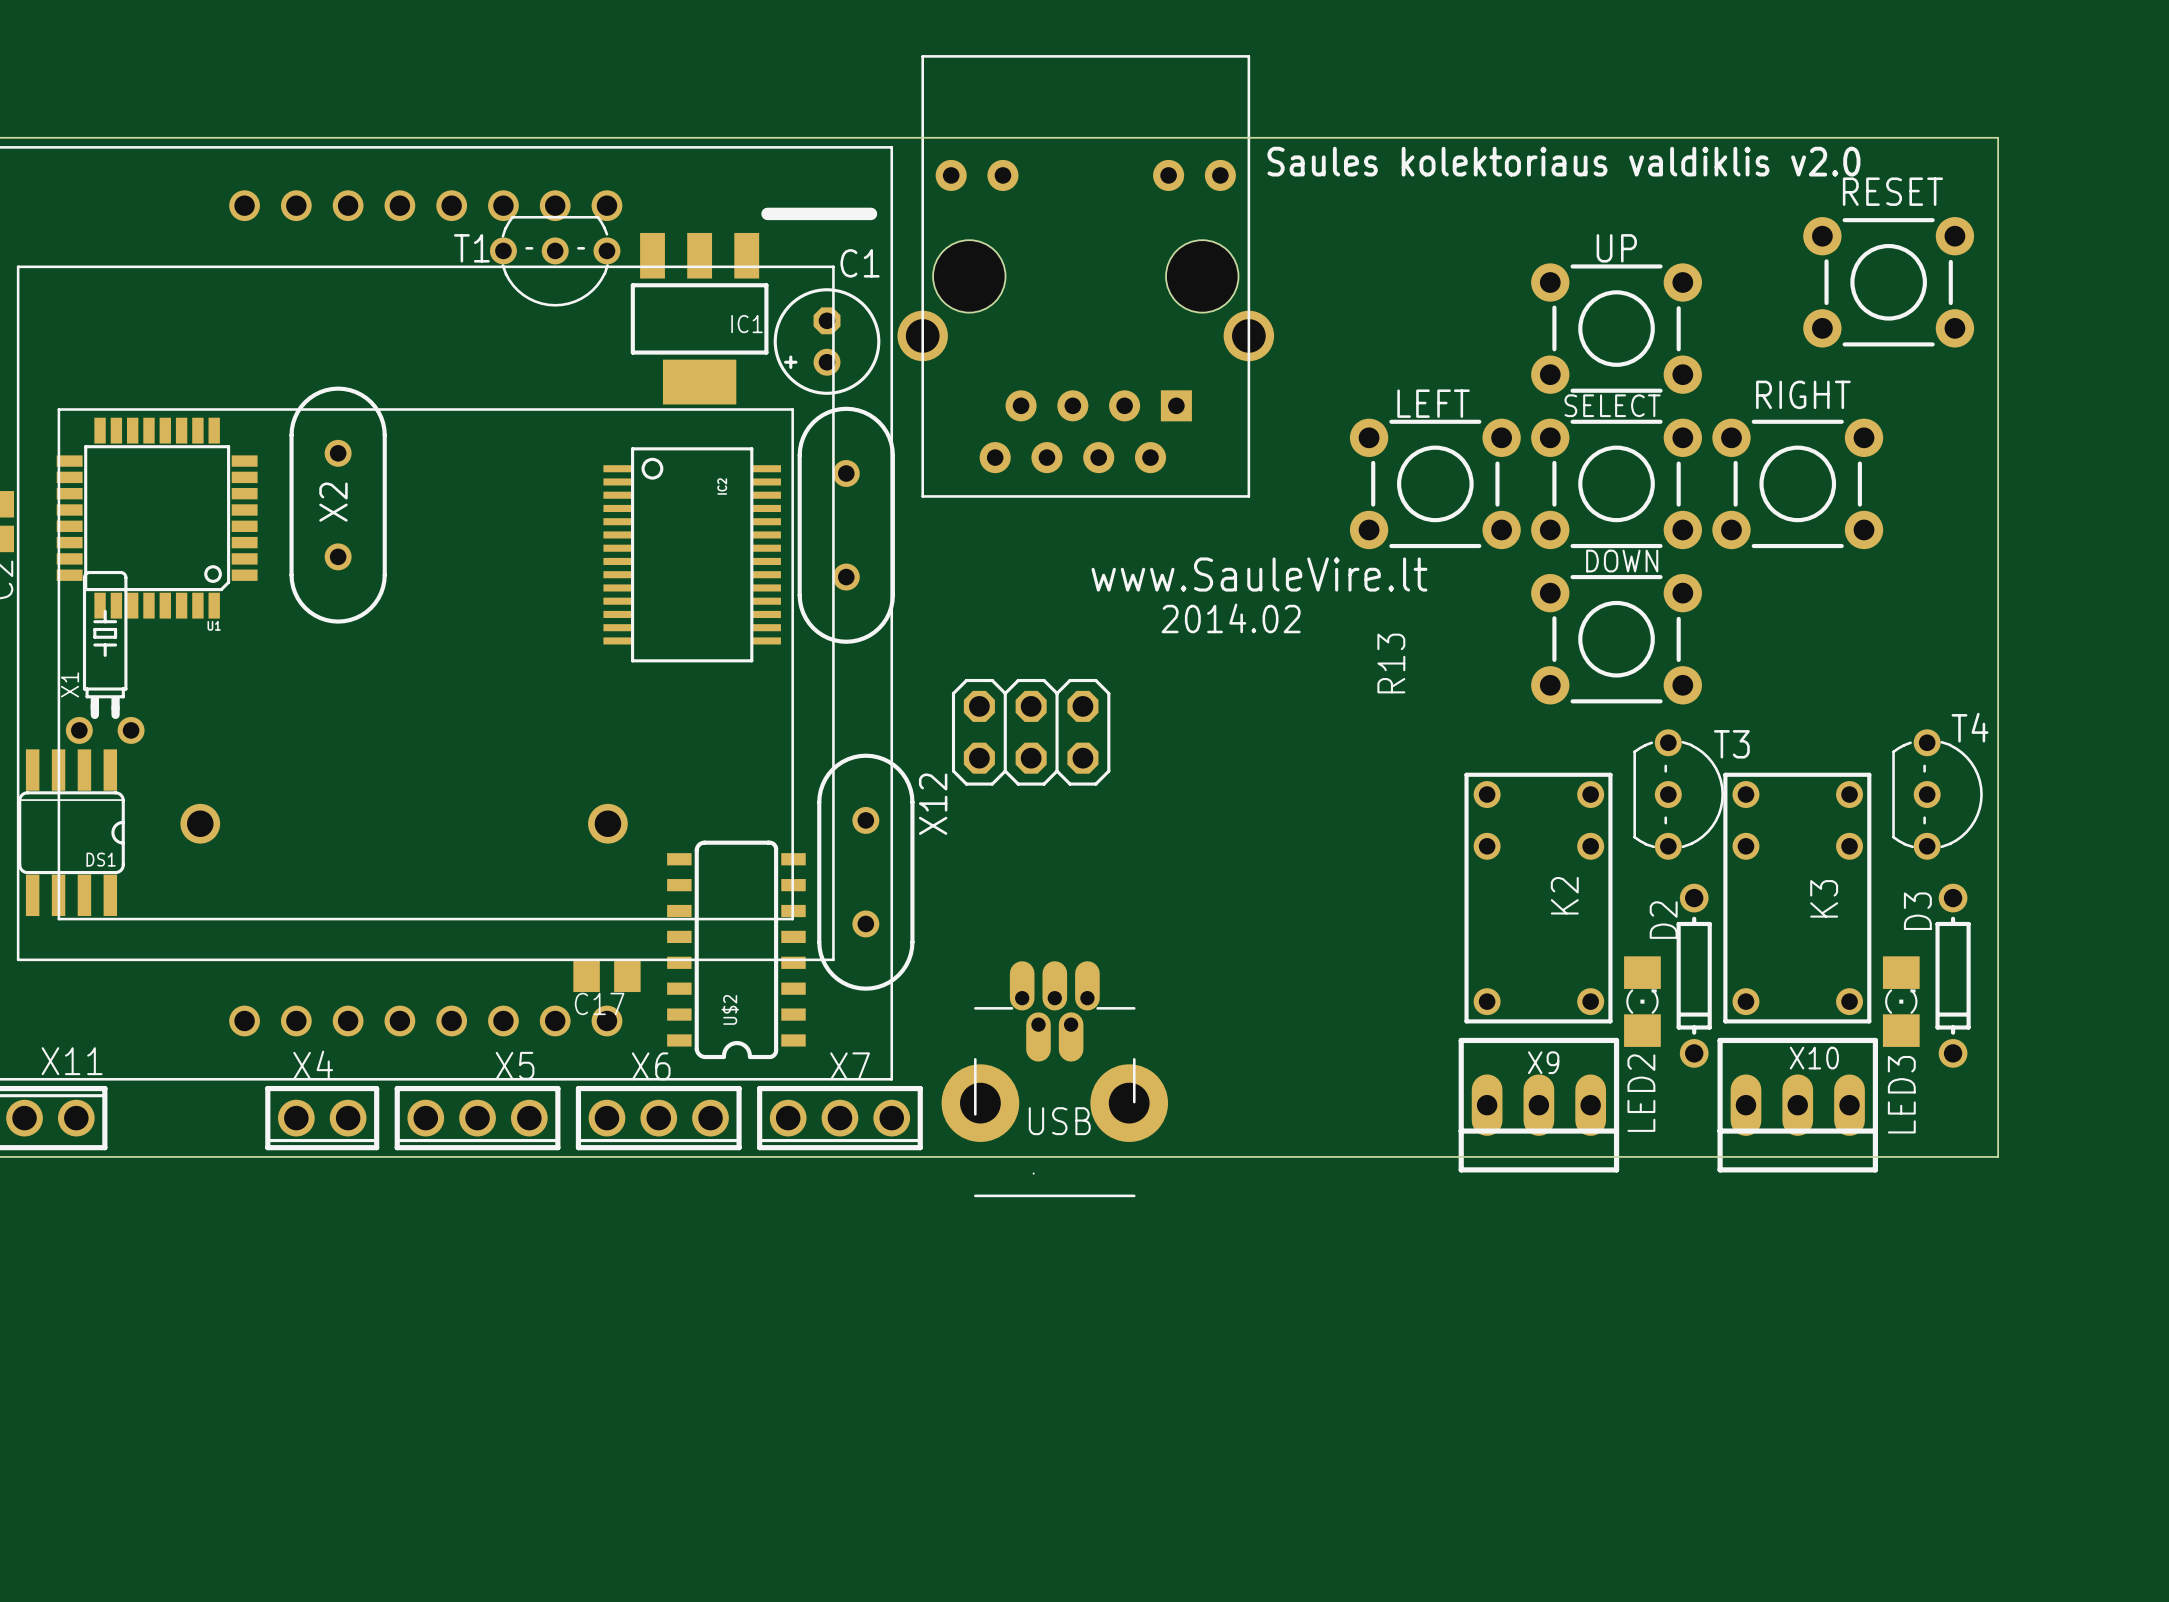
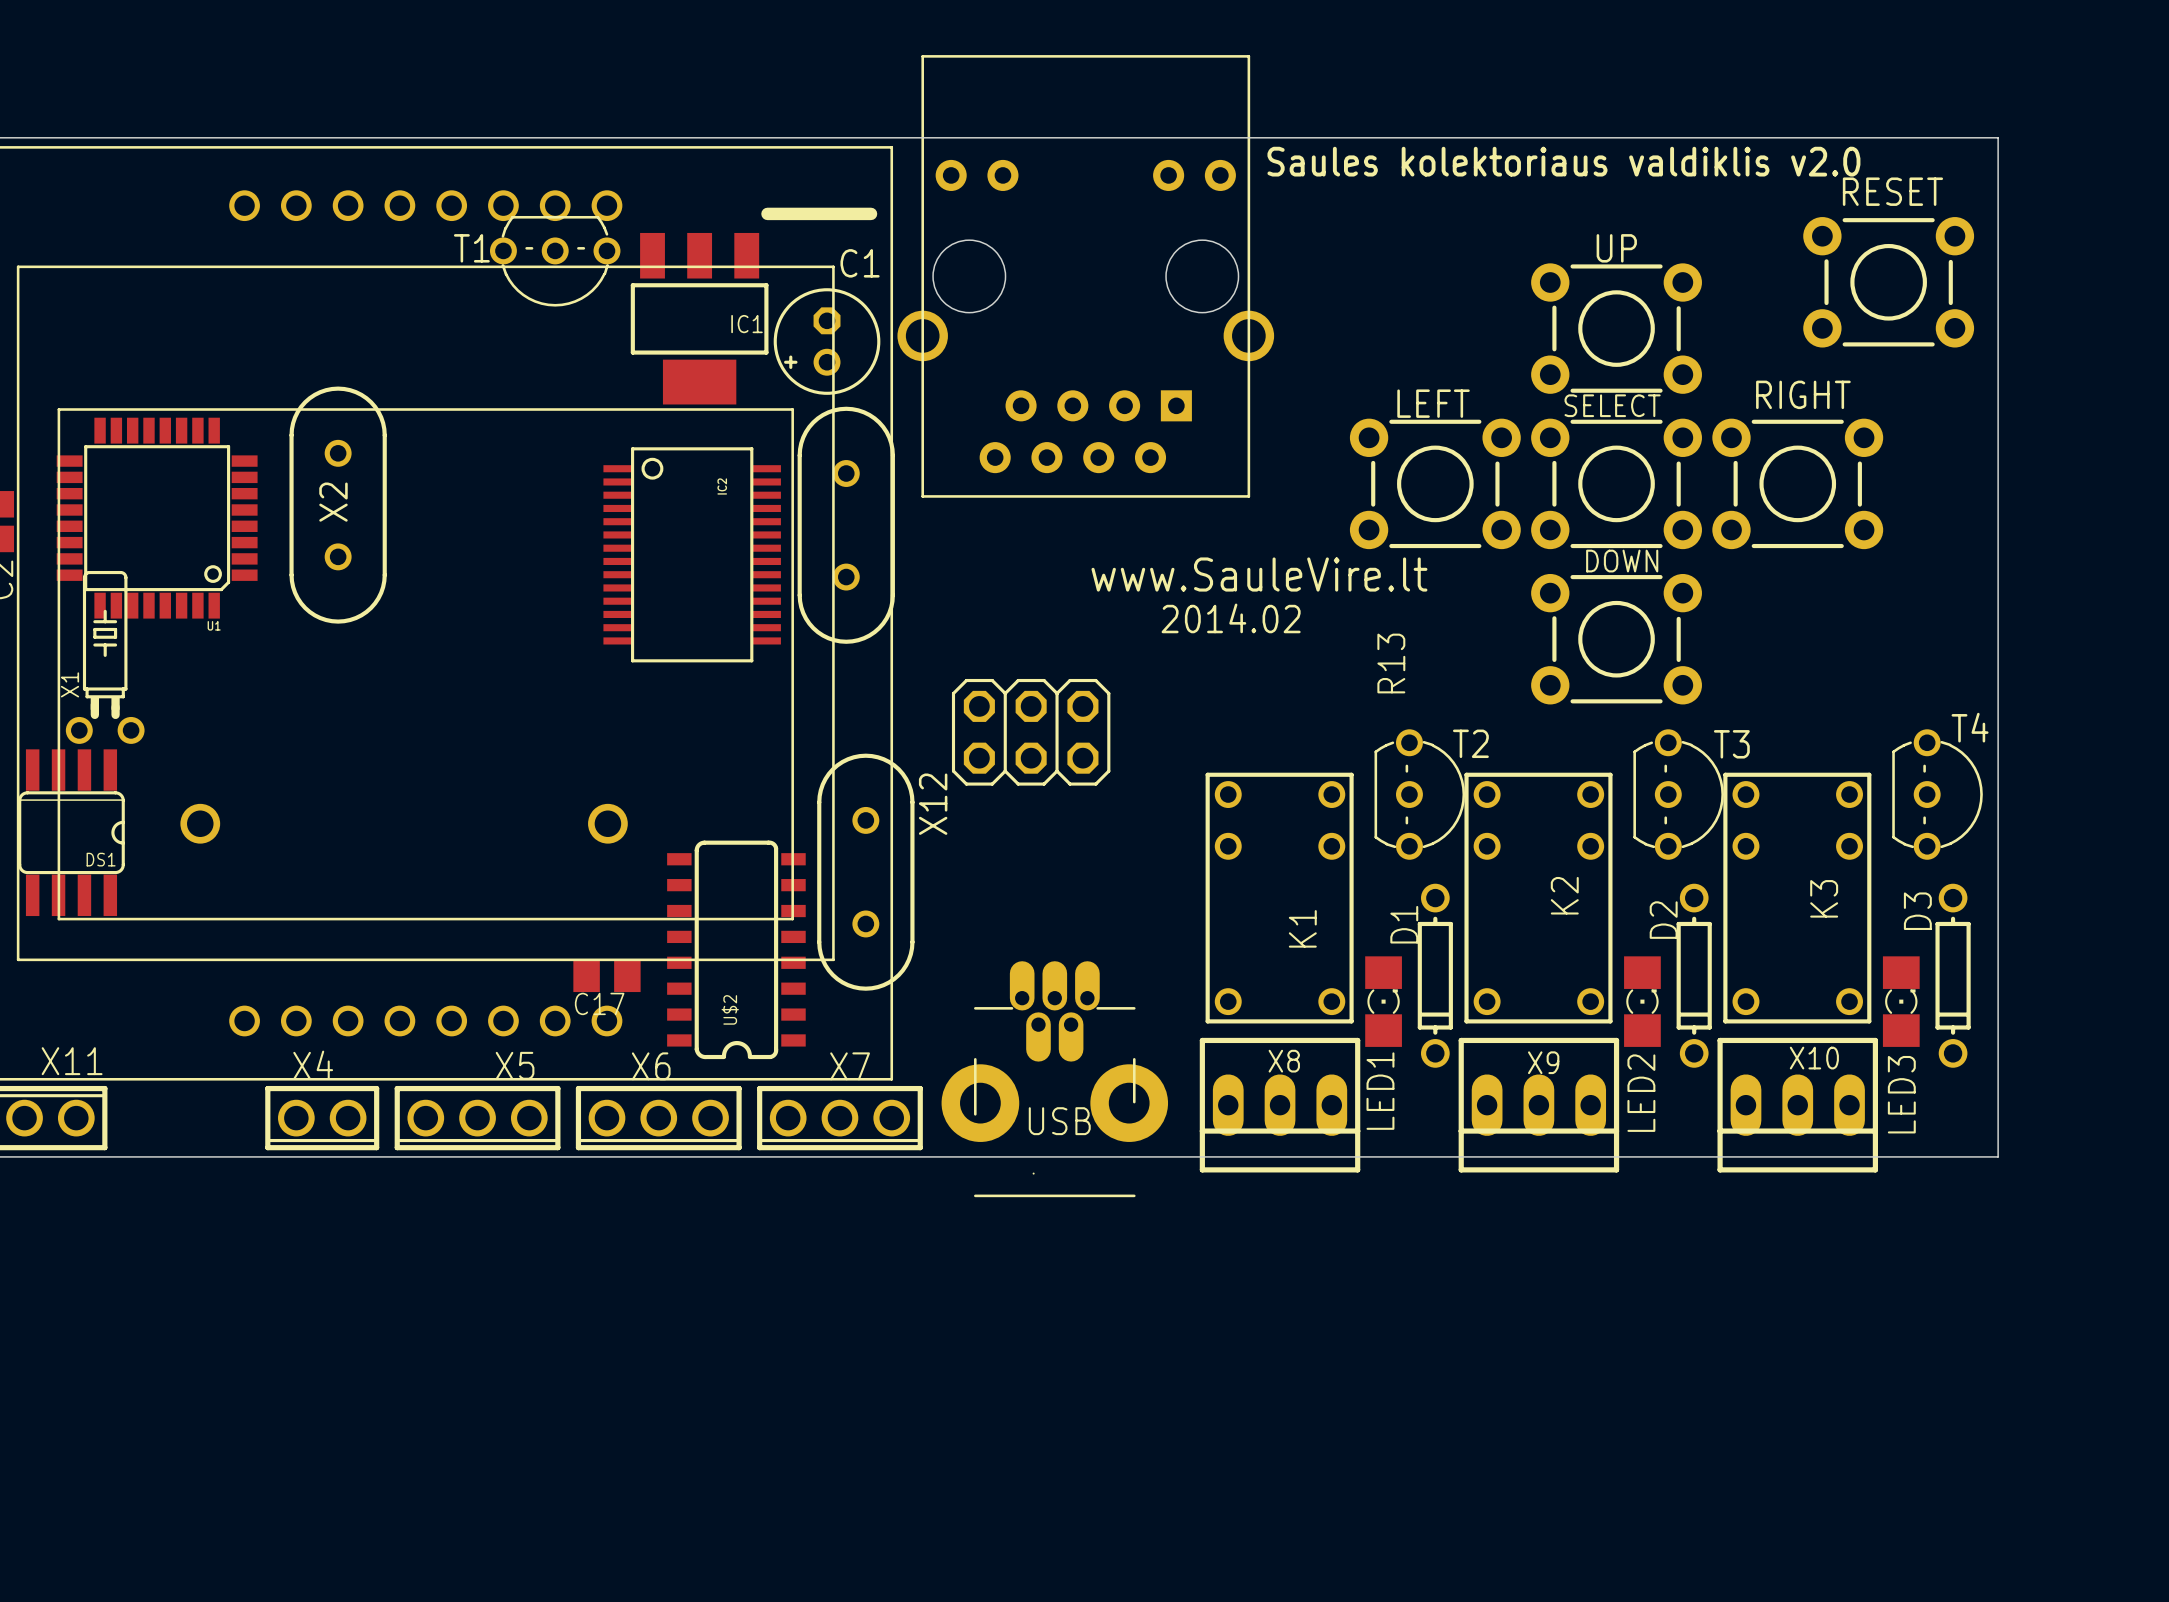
T2: none -> (1419, 794)
K1: none -> (1279, 898)
D1: none -> (1435, 975)
LED1: none -> (1383, 1001)
X8: none -> (1280, 1105)

